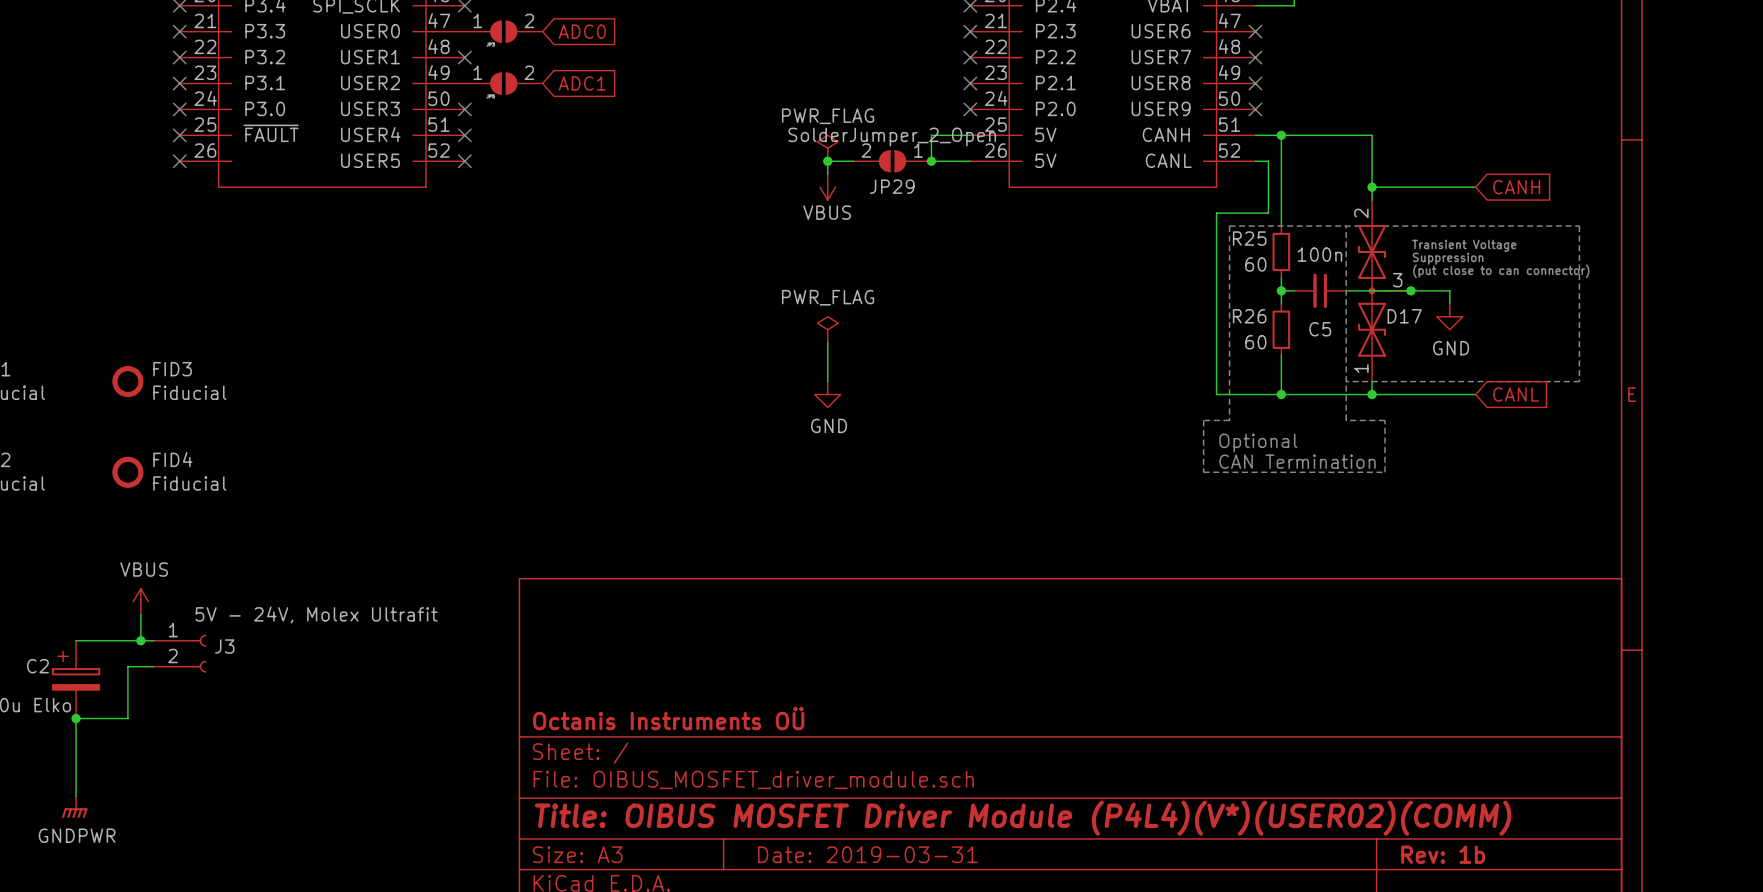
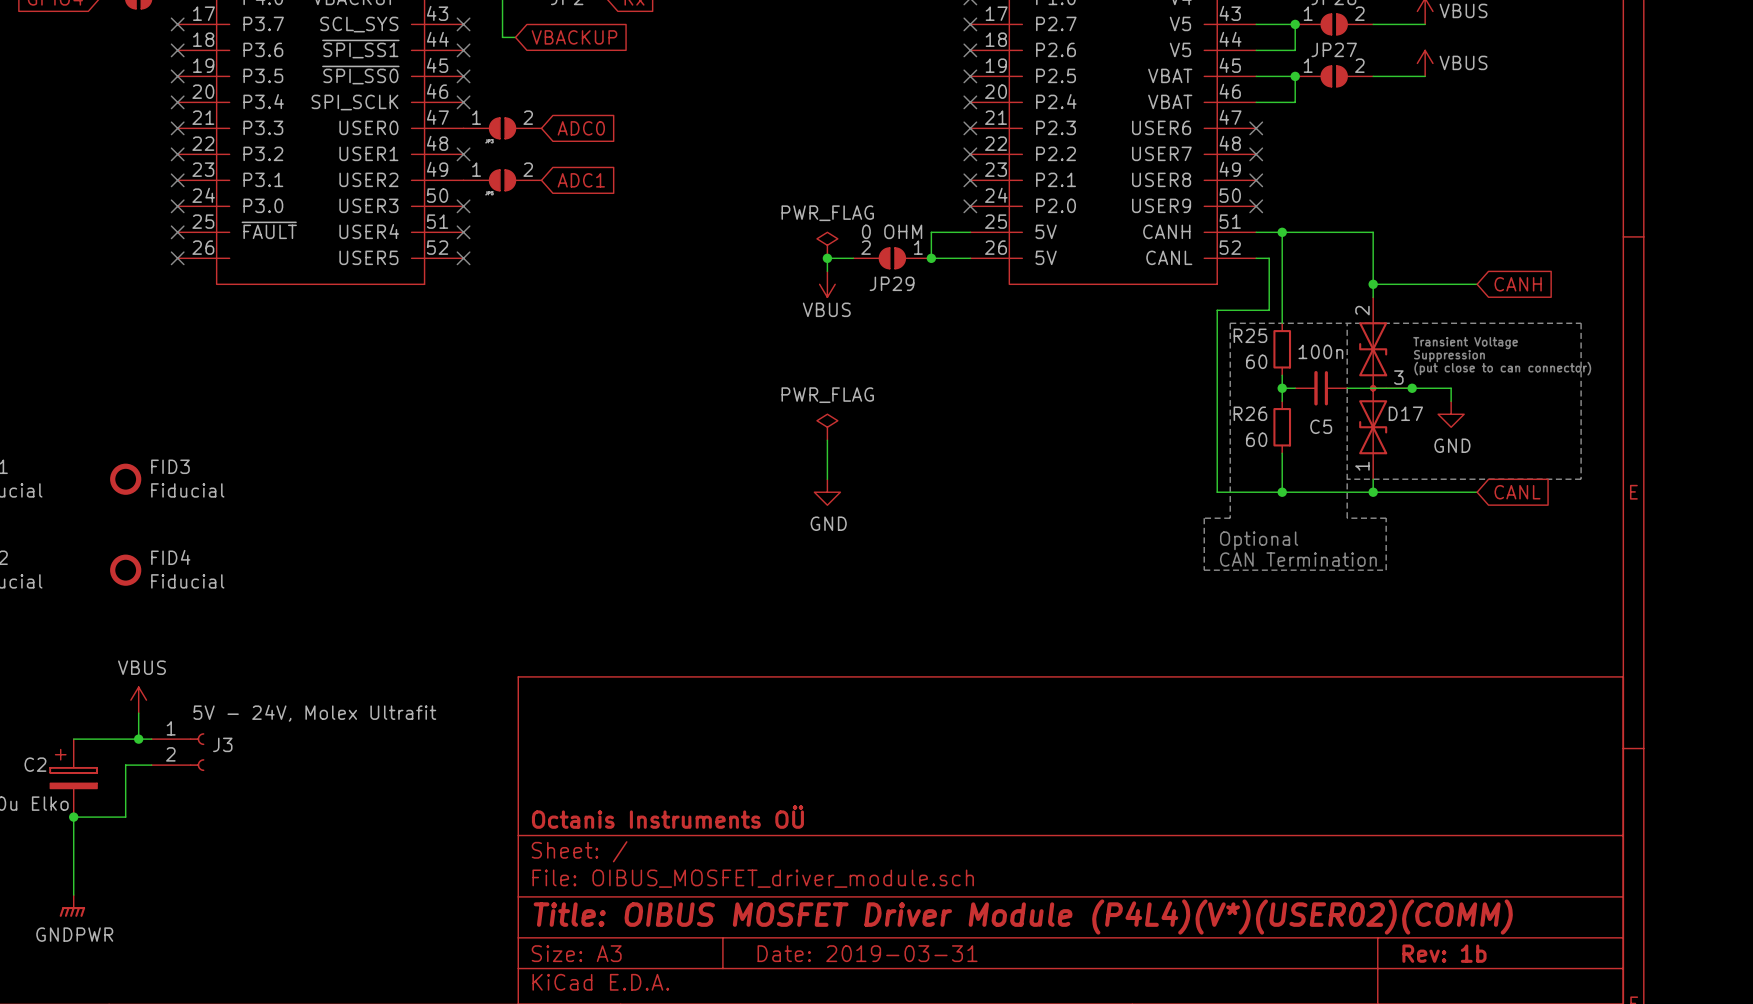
JP29 value: SolderJumper_2_Open (892, 137) -> 0 OHM (892, 231)

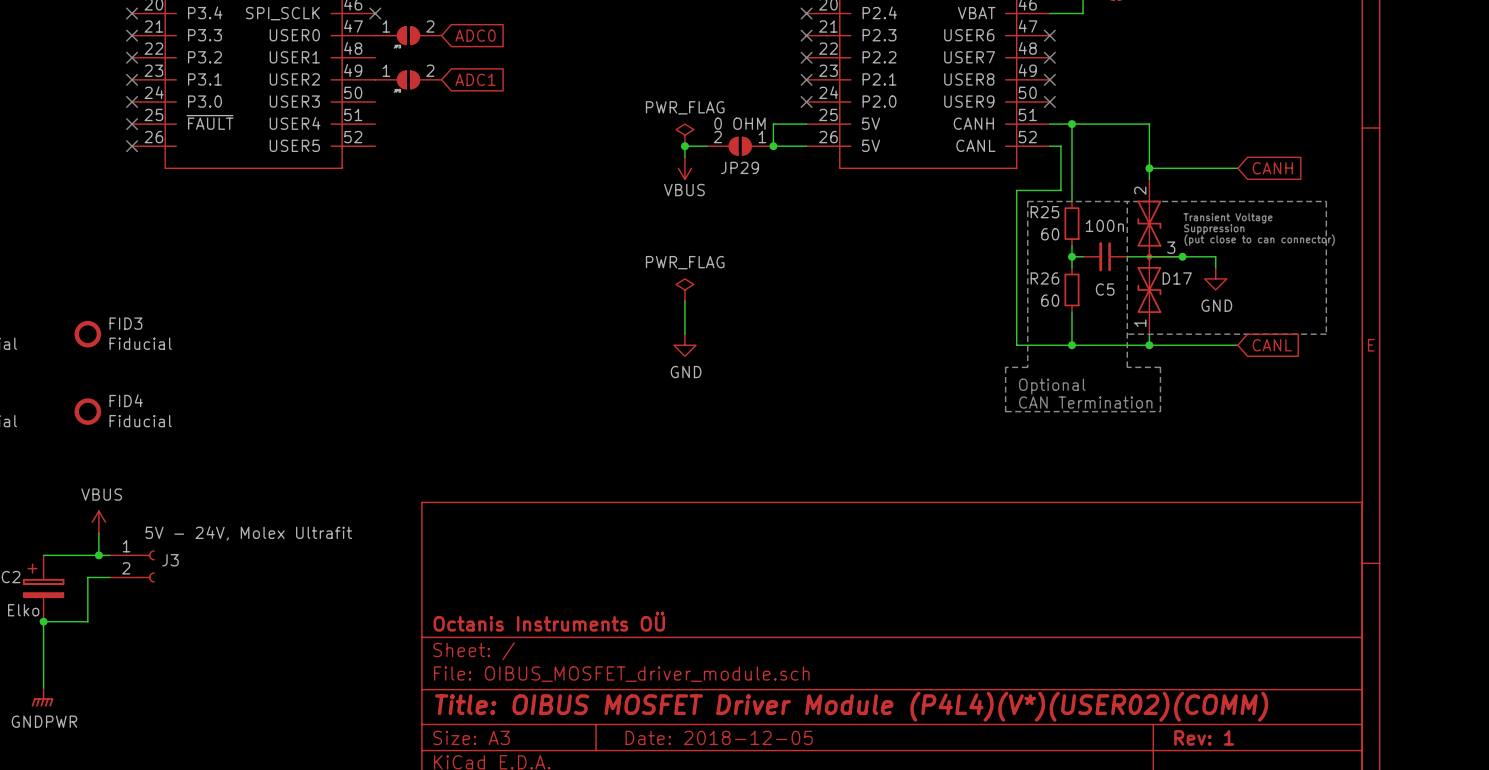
no-connect mark: (463, 154) -> none
no-connect mark: (463, 206) -> none
no-connect mark: (463, 232) -> none
no-connect mark: (463, 258) -> none
title block: Date: 2019-03-31 (867, 953) -> Date: 2018-12-05 (719, 737)
title block: Rev: 1b (1444, 953) -> Rev: 1 (1204, 737)

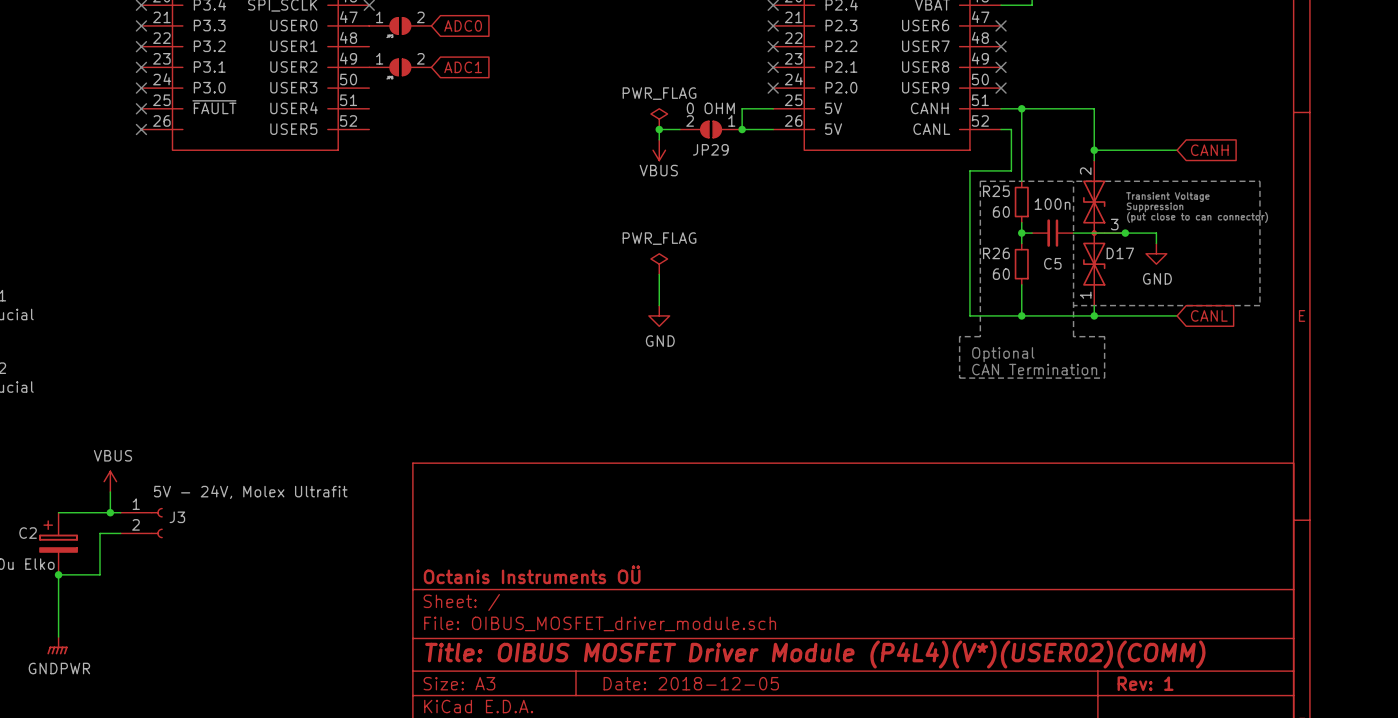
FID3: Fiducial (87, 334) -> none
FID4: Fiducial (87, 411) -> none

